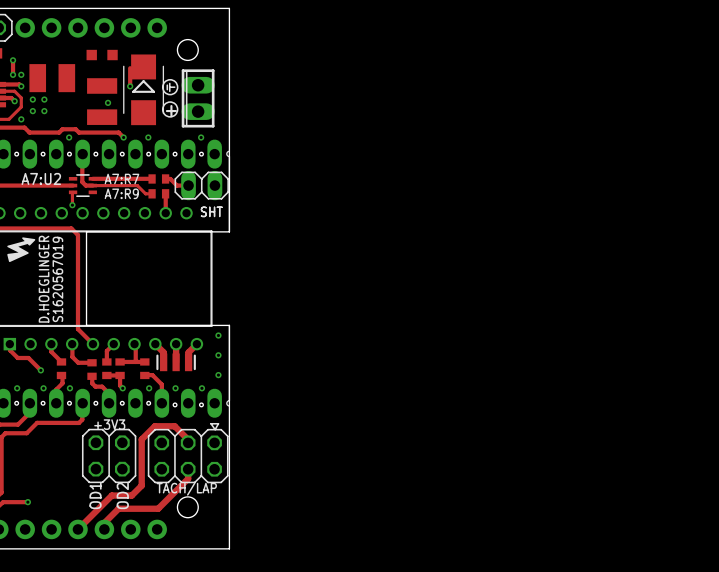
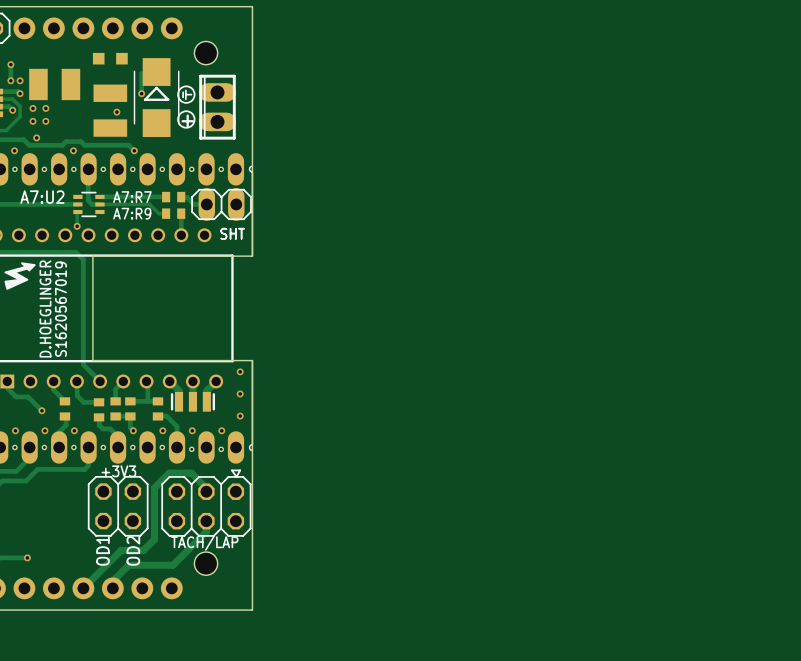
via: (21, 119) -> none
via: none -> (36, 137)
via: none -> (14, 150)
via: (148, 137) -> none
via: (201, 137) -> none

